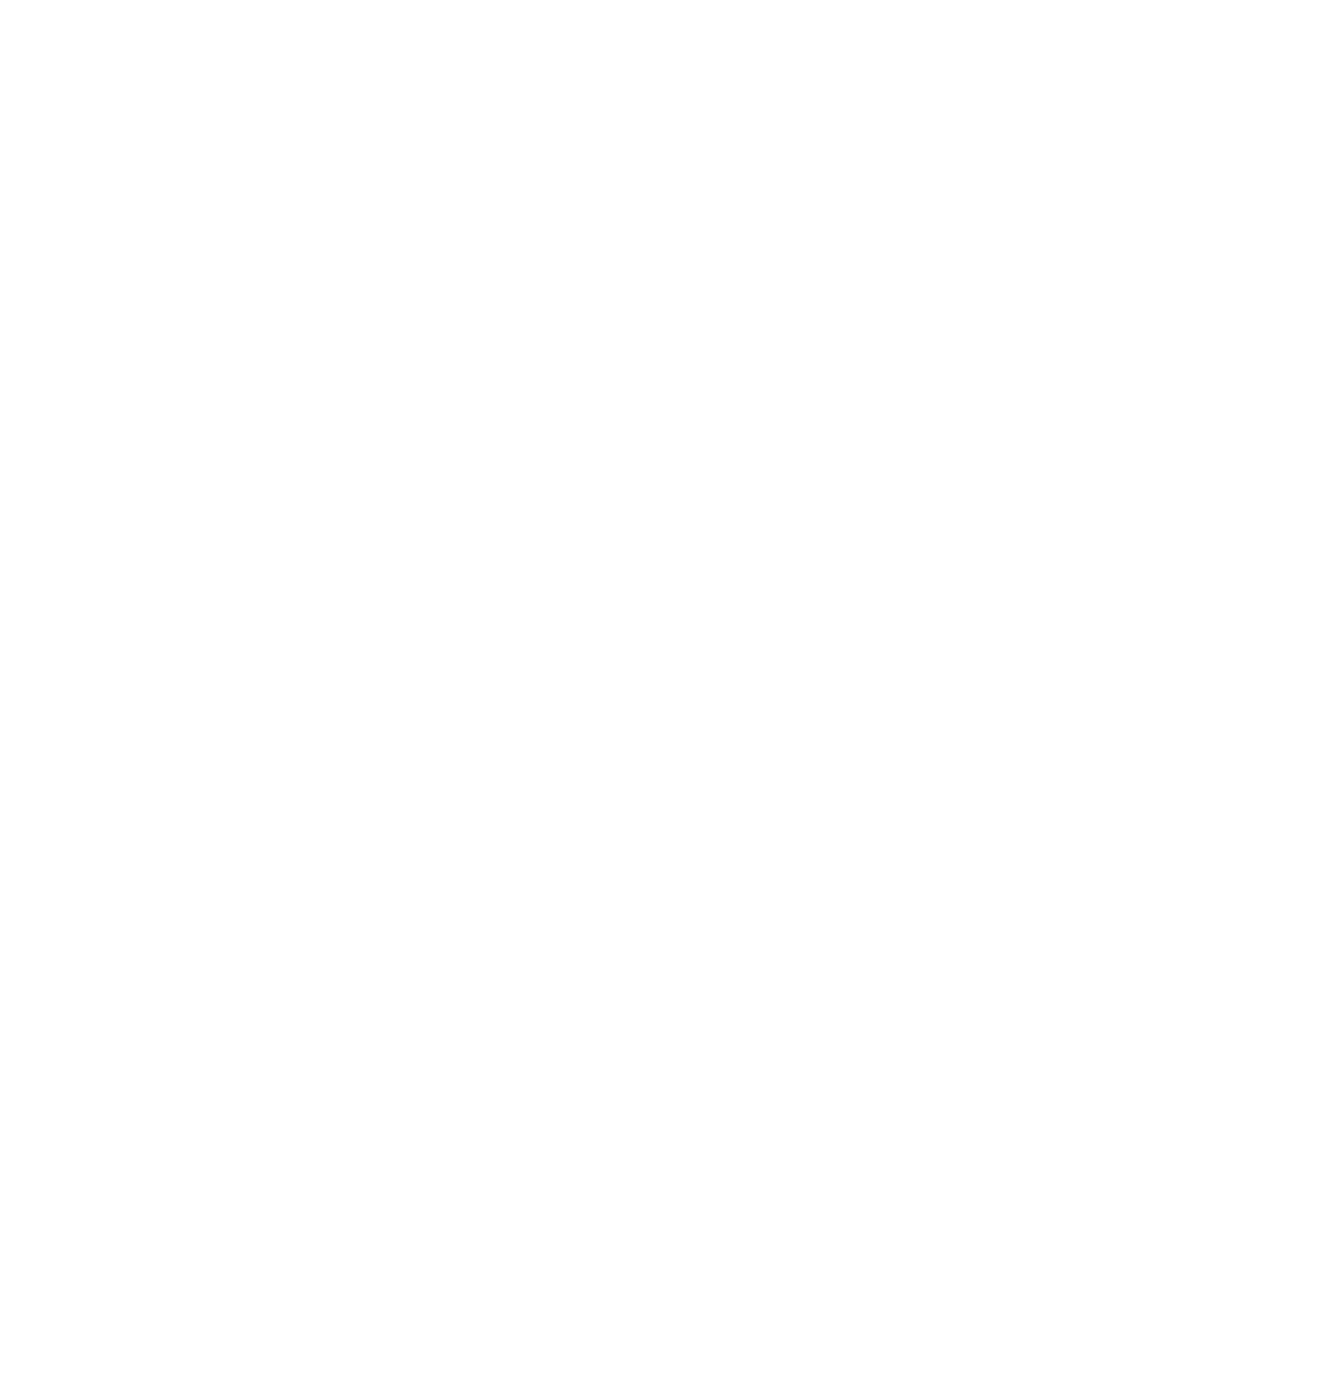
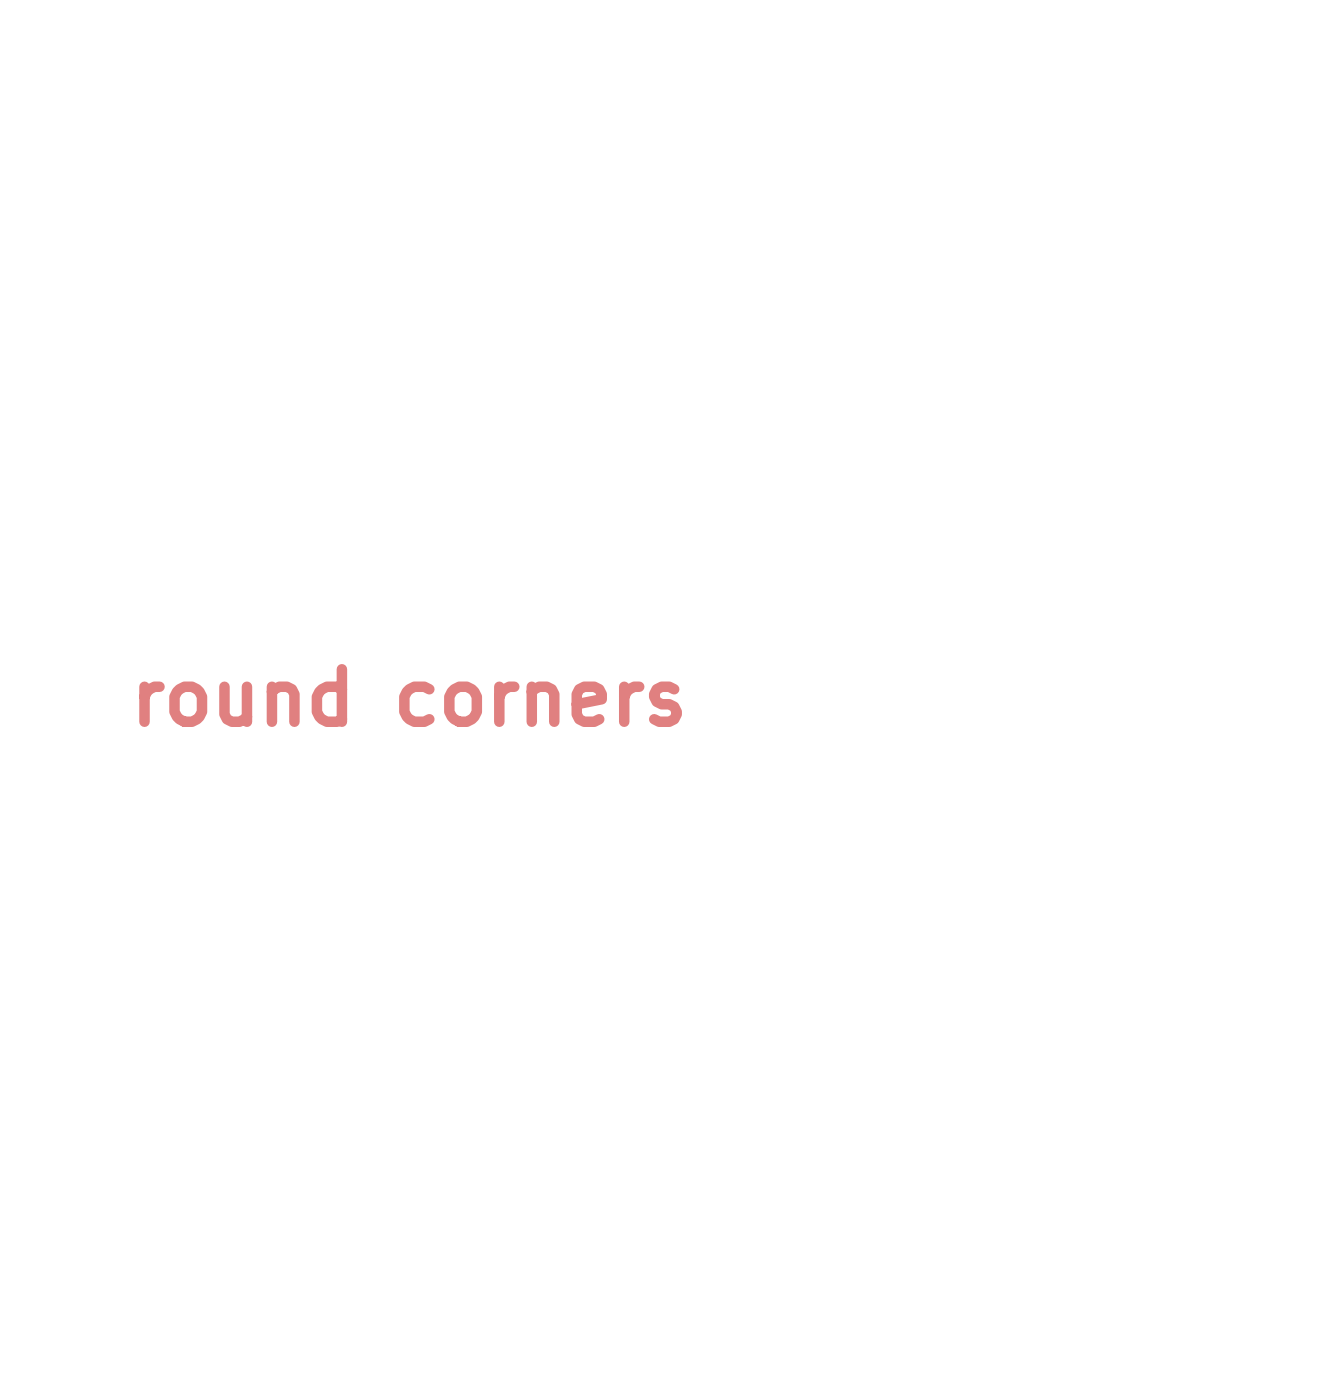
text: none -> round corners (410, 695)

